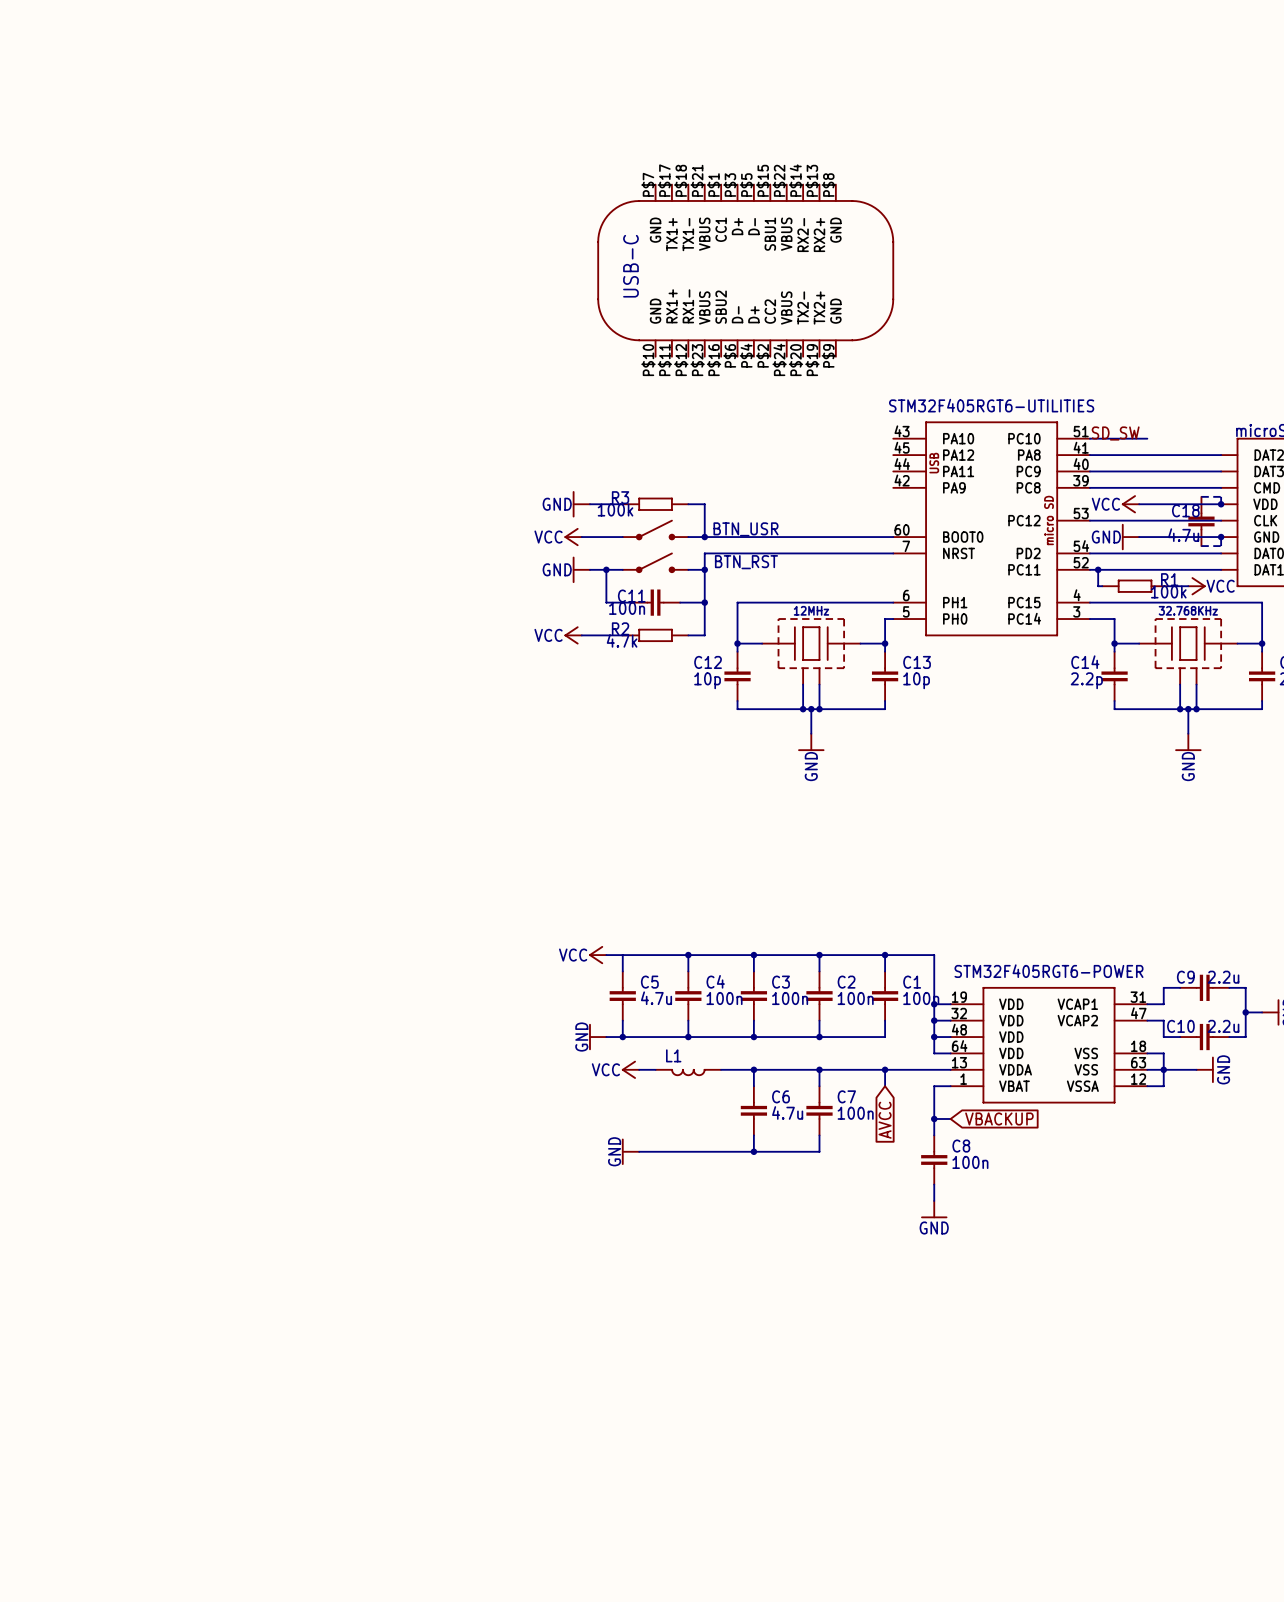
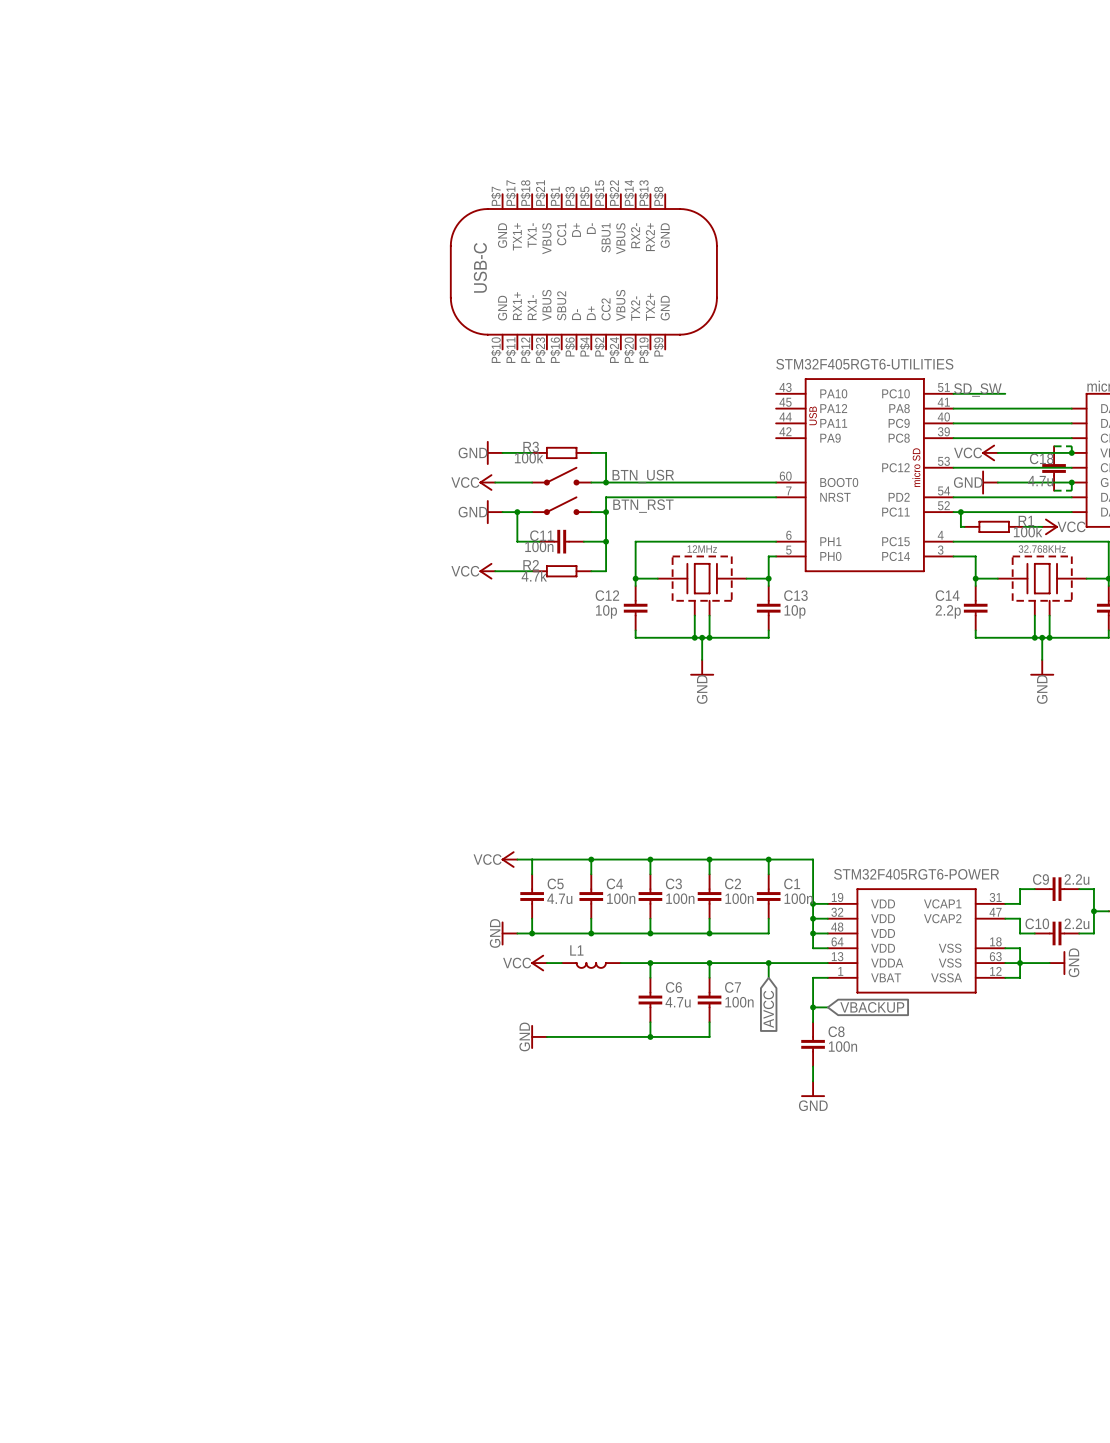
part position: (745, 270) -> (583, 271)

